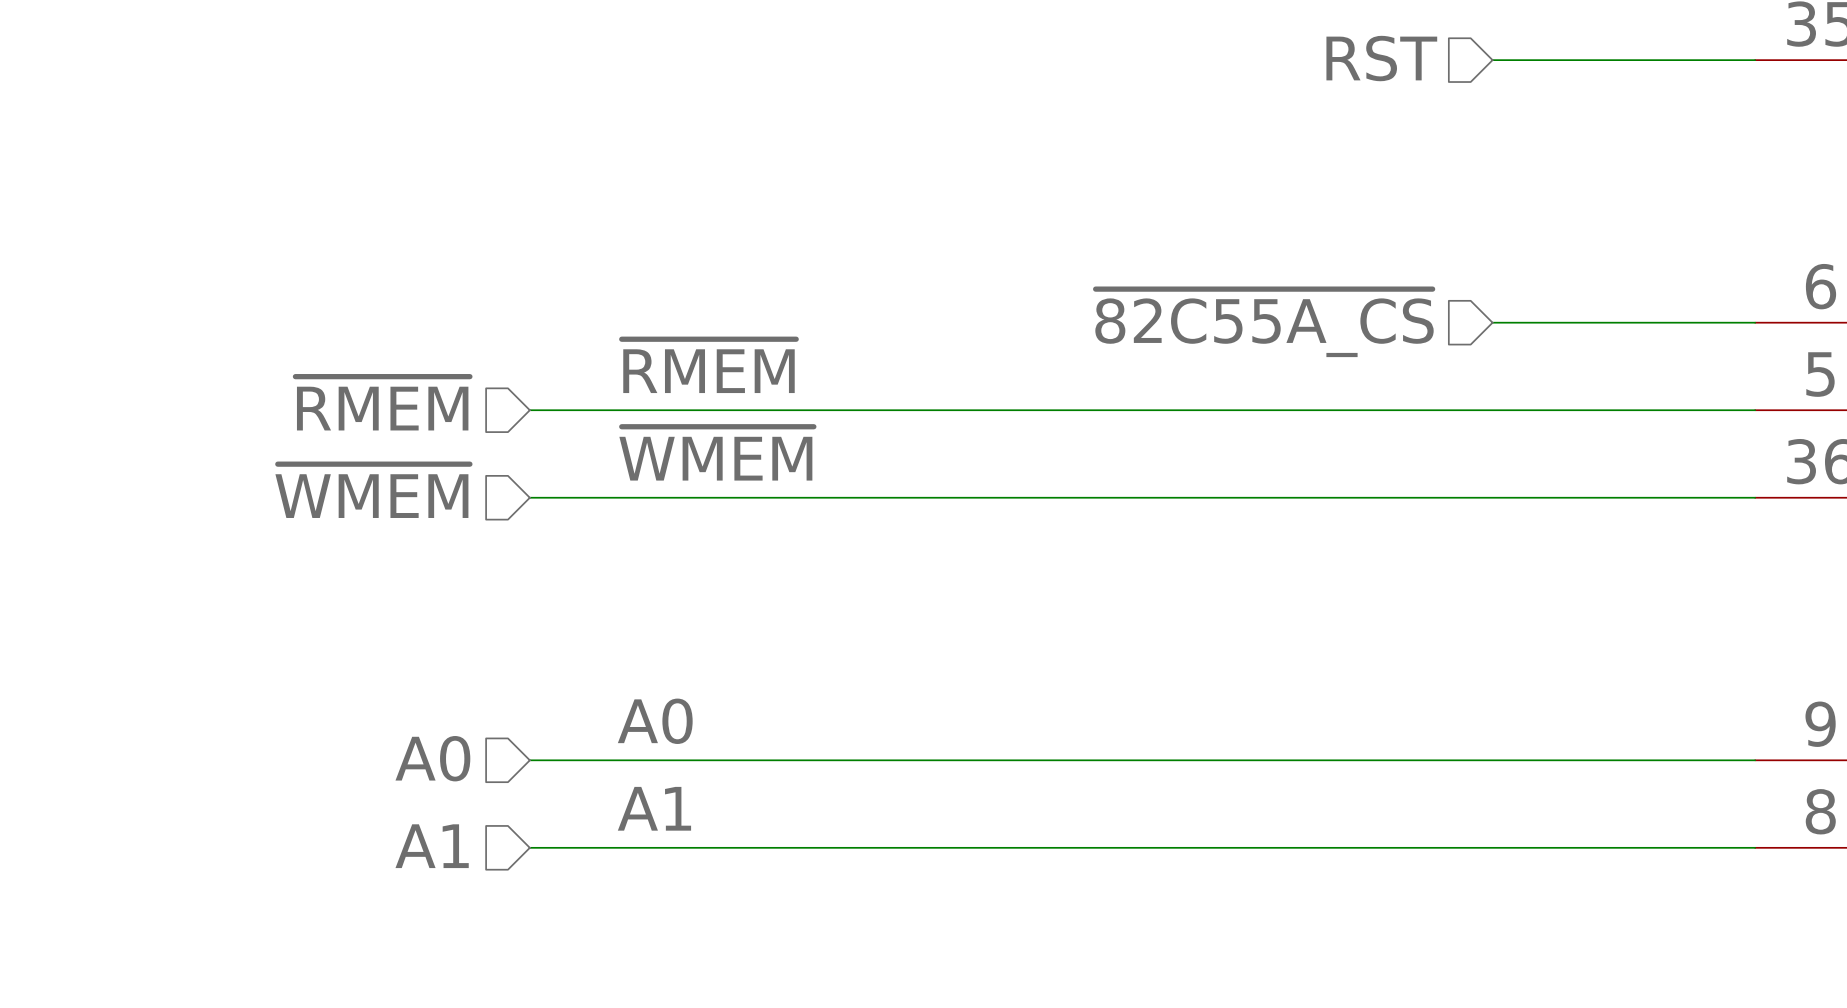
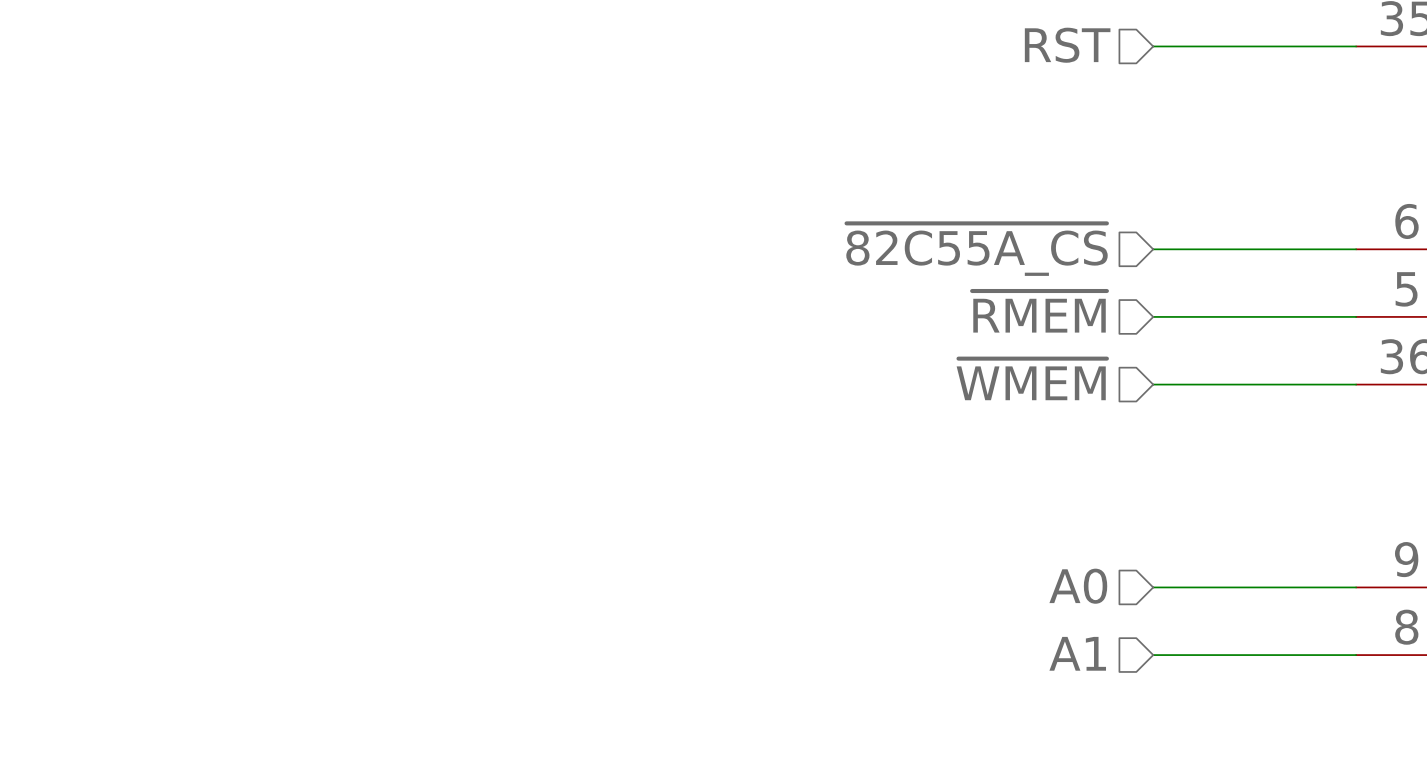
label: ~{RMEM} (708, 366) -> none
hierarchical label: ~{RMEM} (382, 403) -> none
hierarchical label: none -> ~{RMEM} (1039, 311)
wire: (529, 410) (1492, 410) -> none
label: ~{WMEM} (716, 453) -> none
hierarchical label: ~{WMEM} (372, 491) -> none
hierarchical label: none -> ~{WMEM} (1031, 379)
wire: (529, 497) (1492, 497) -> none
label: A0 (655, 721) -> none
hierarchical label: A0 (432, 758) -> none
hierarchical label: none -> A0 (1078, 586)
wire: (529, 760) (1492, 760) -> none
label: A1 (654, 808) -> none
hierarchical label: A1 (432, 846) -> none
hierarchical label: none -> A1 (1077, 653)
wire: (529, 847) (1492, 847) -> none

